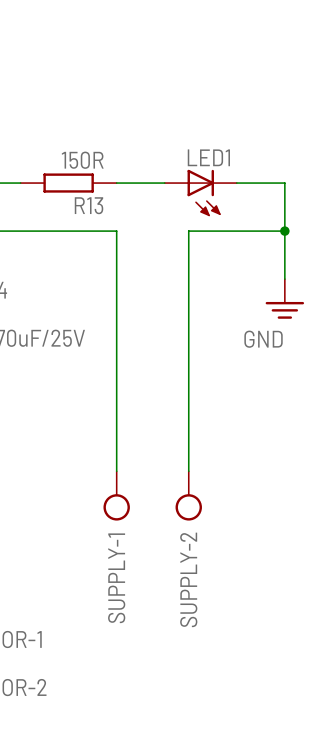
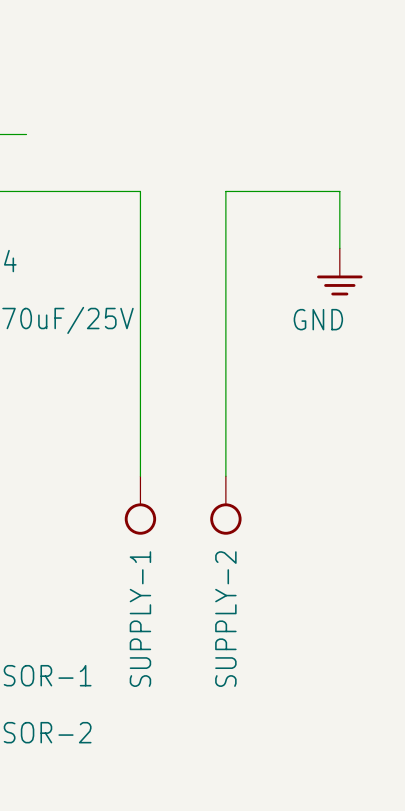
R13: 150R (68, 183) -> none
wire: (116, 183) (164, 183) -> none
wire: (236, 183) (284, 183) (284, 231) -> none
LED1: (200, 193) -> none
junction: (284, 231) -> none

